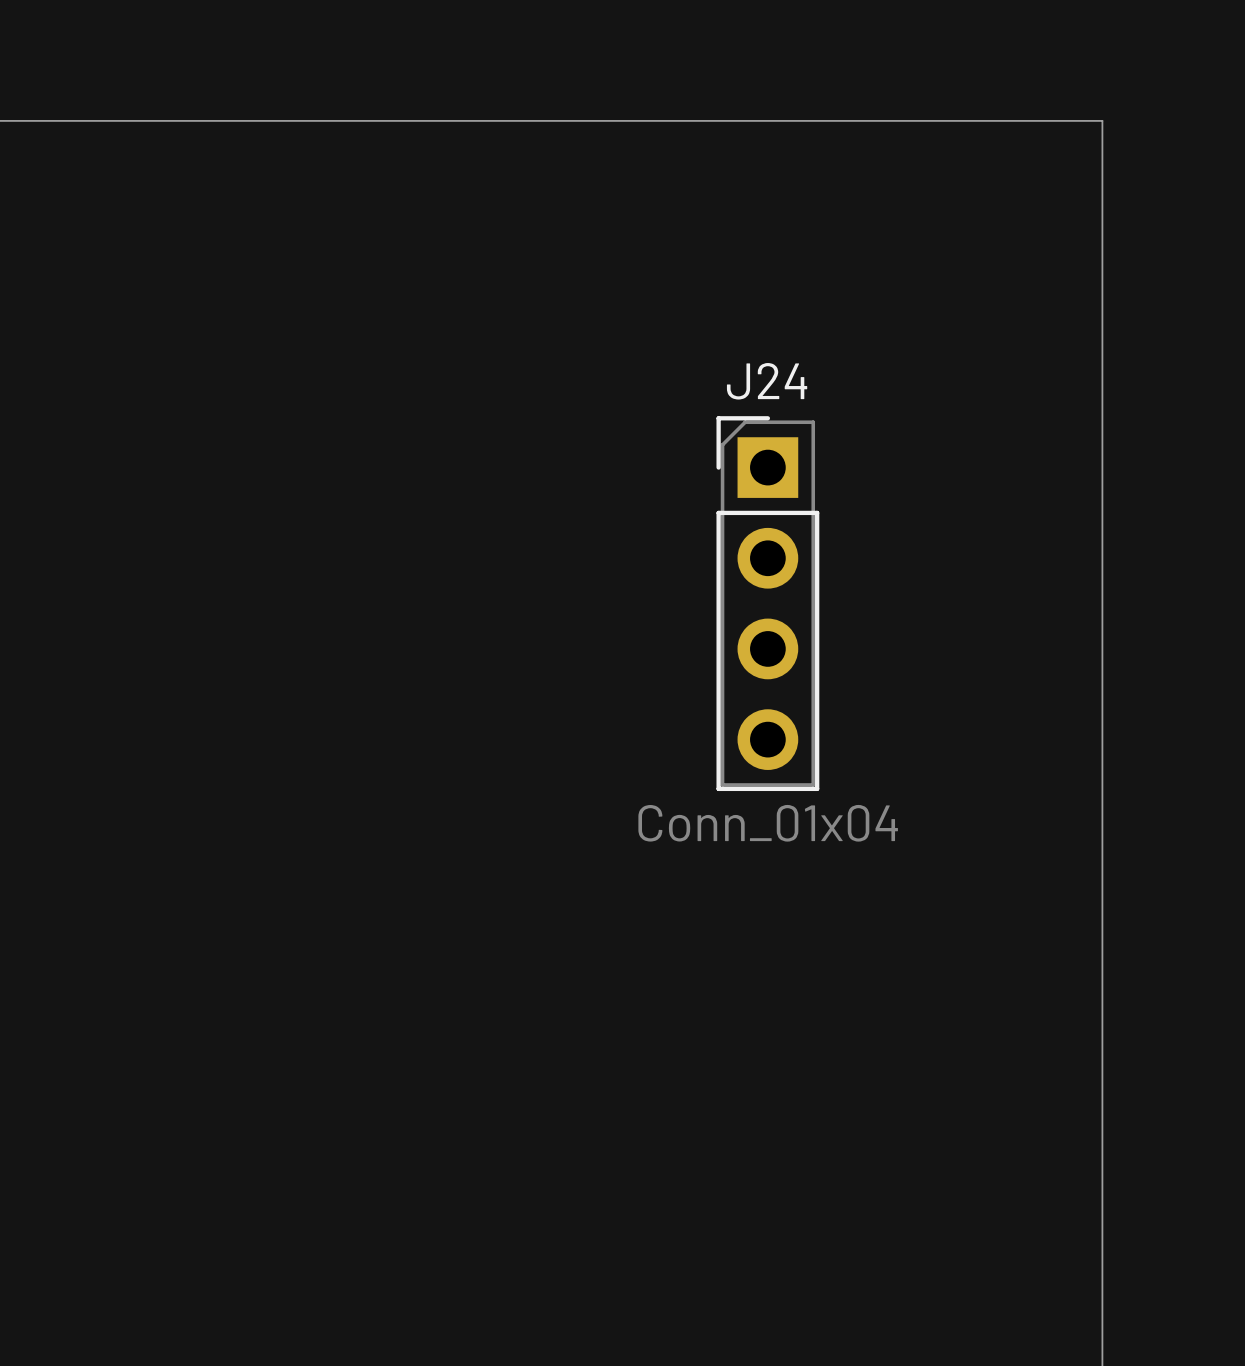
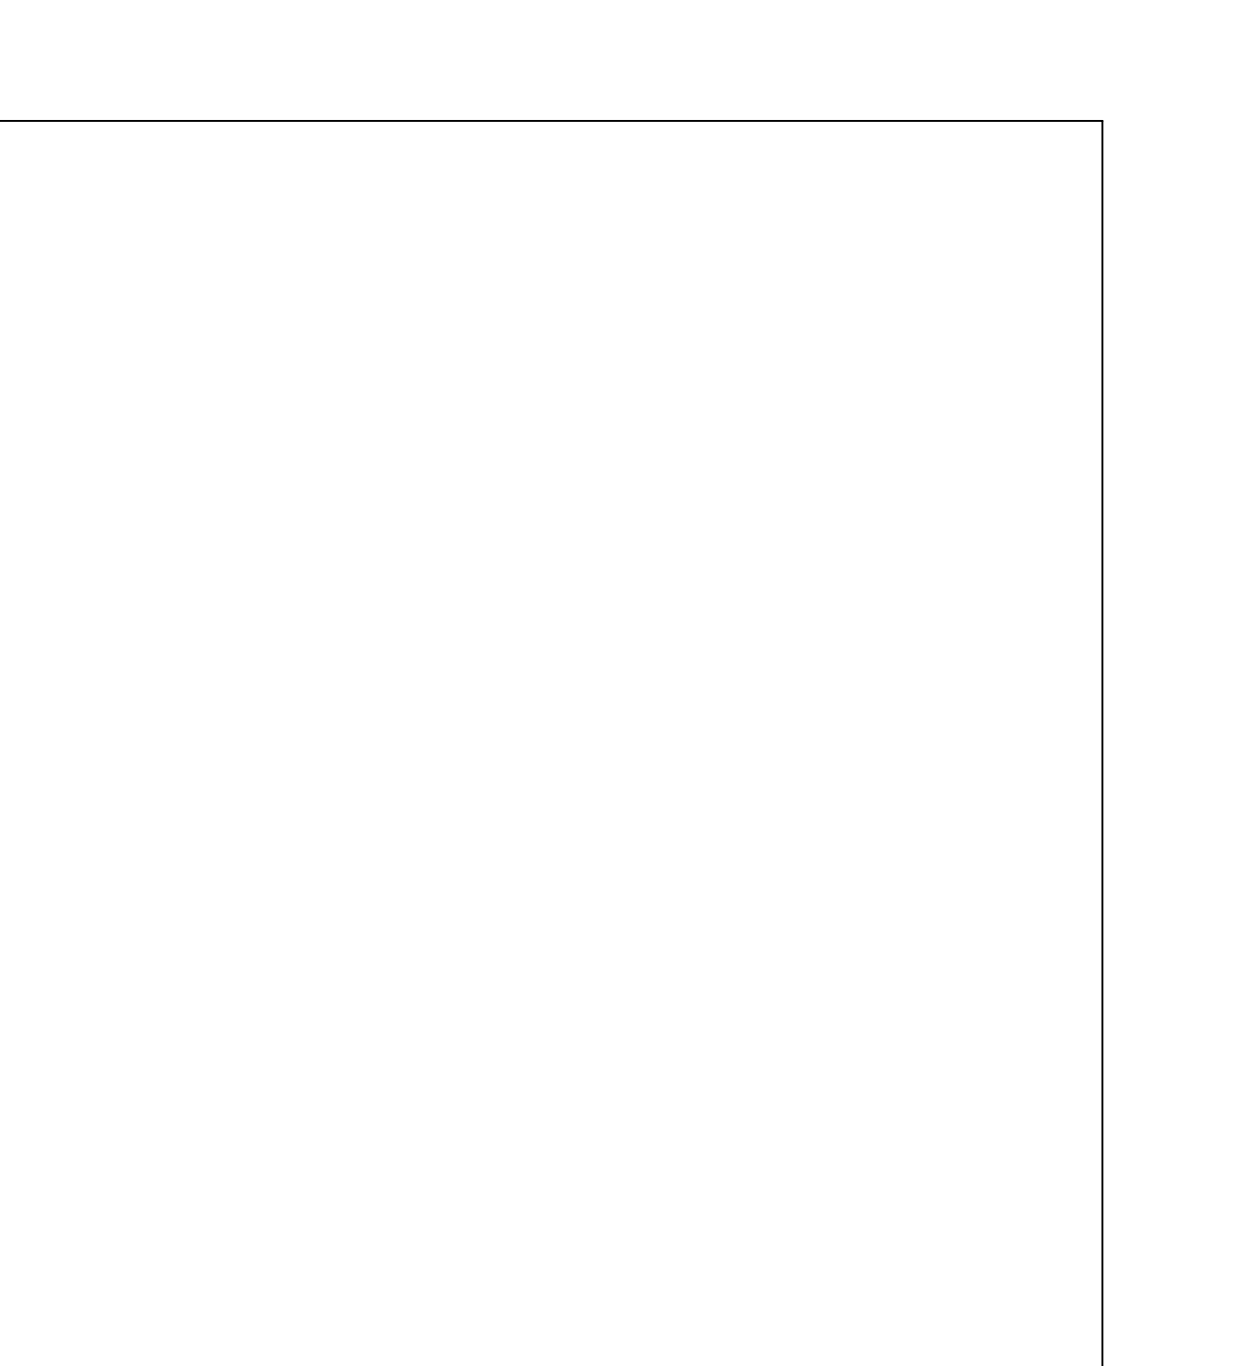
J24: Conn_01x04 (767, 603) -> none

